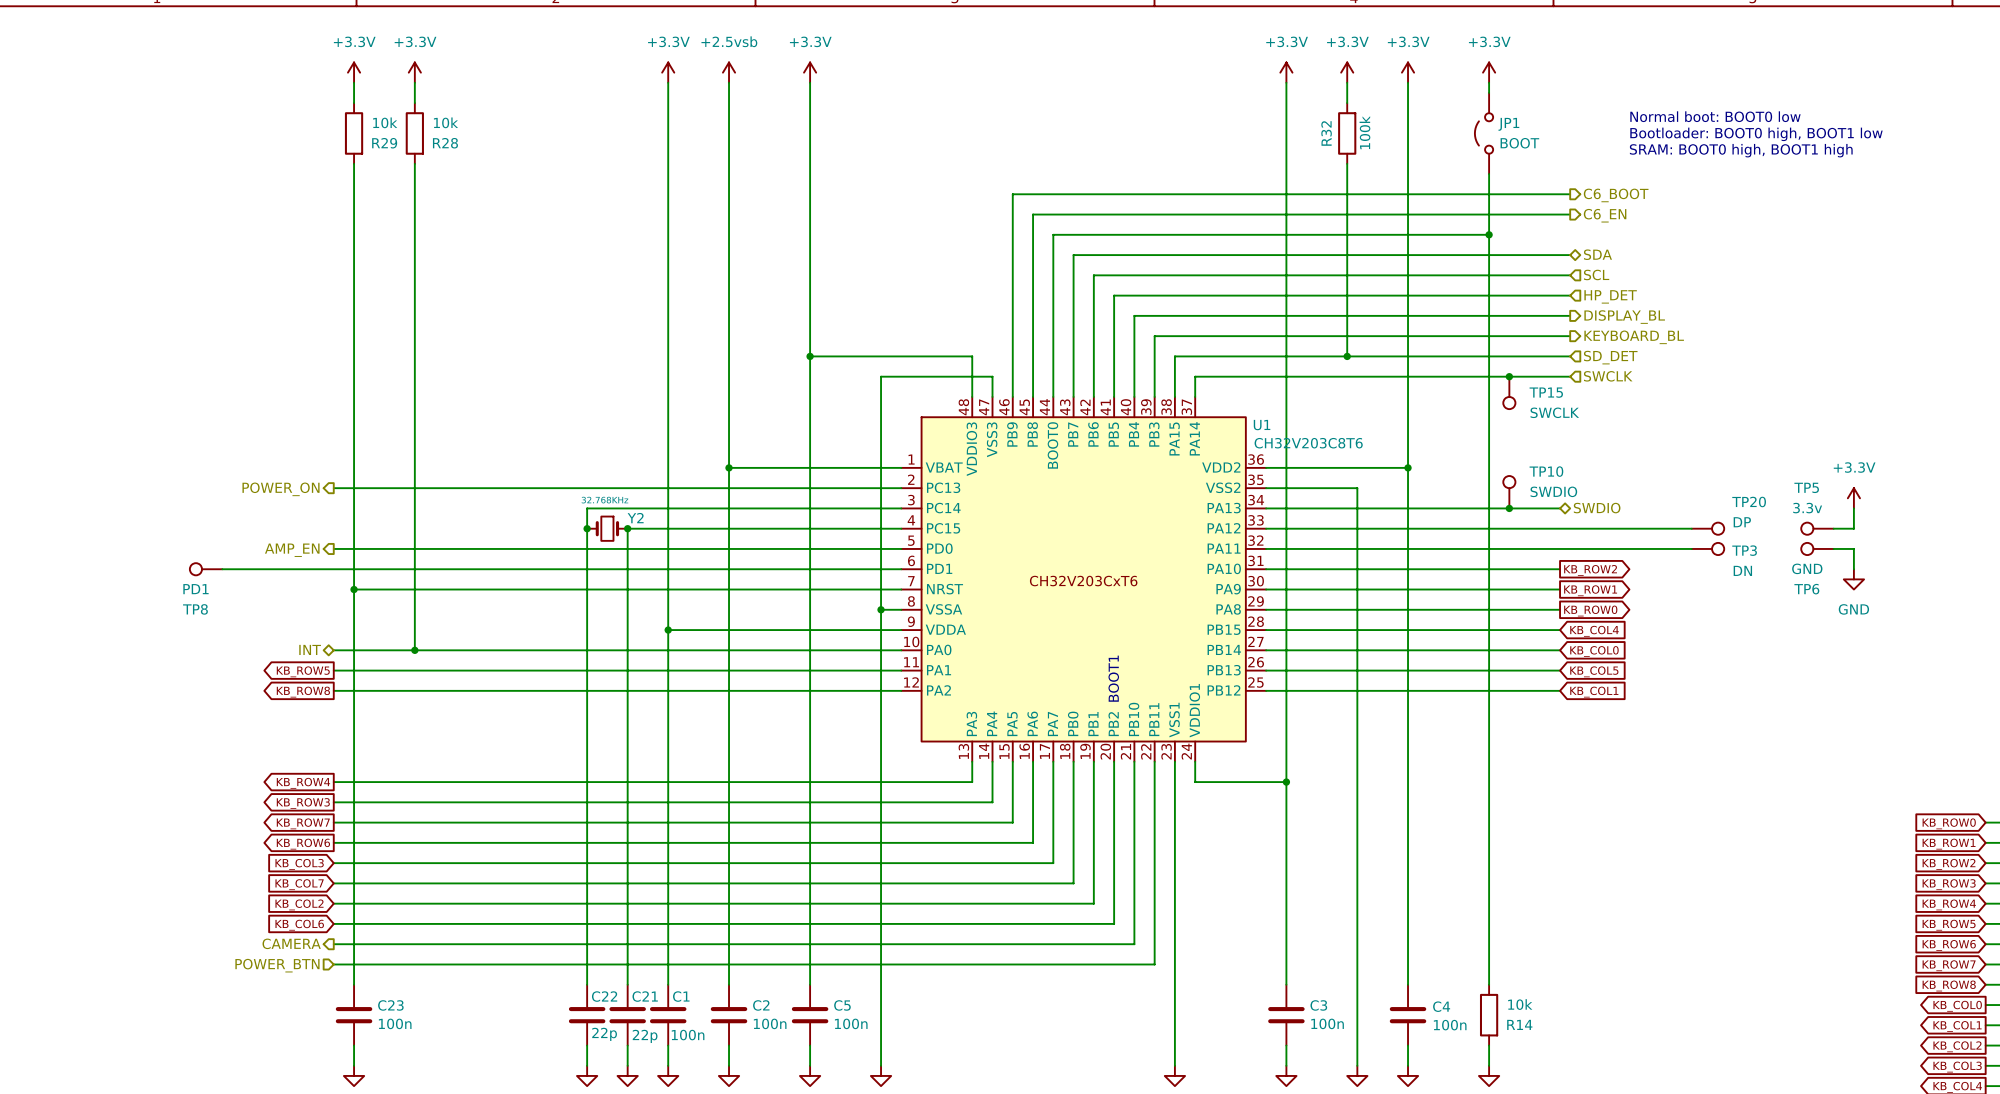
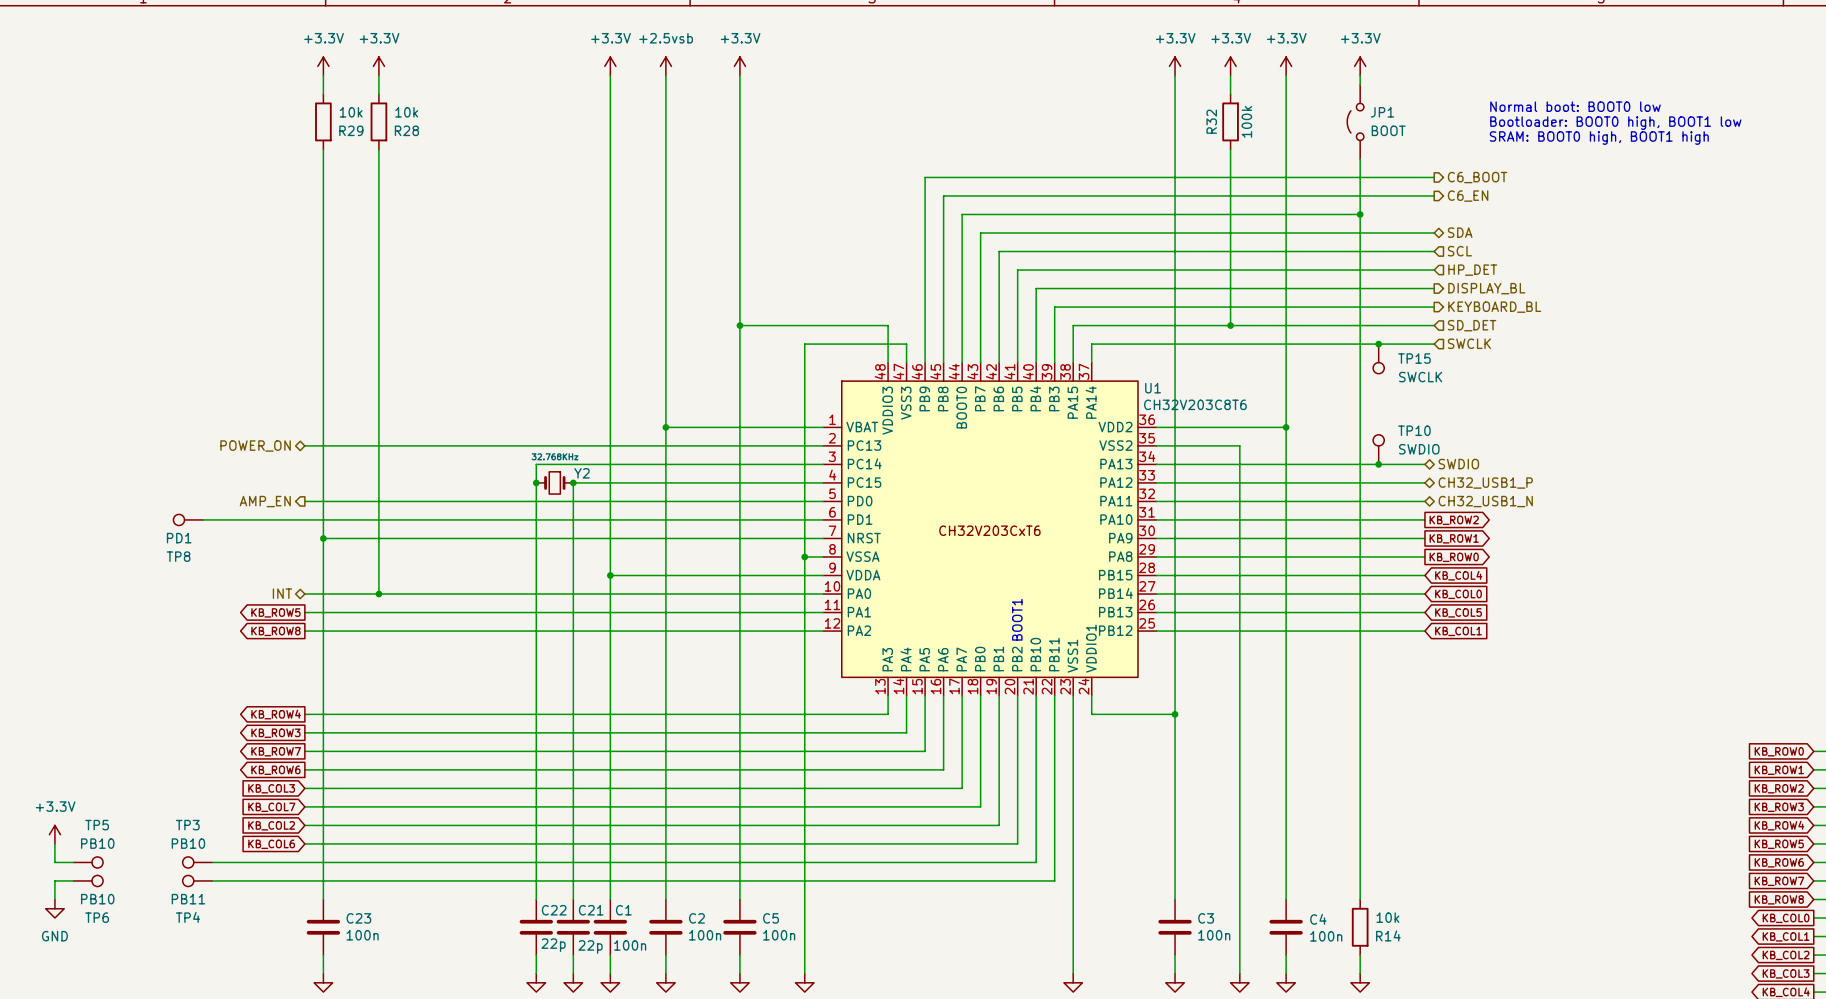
TP5 name position: TP5 (1806, 487) -> TP5 (97, 825)
hierarchical label shape: output (281, 489) -> bidirectional (255, 446)
power symbol: +3.3V (1853, 498) -> none
TP5 value: 3.3v (1807, 508) -> PB10 (97, 843)
wire: (1853, 508) (1853, 528) (1833, 528) -> none
wire: (1560, 528) (1691, 528) -> none
TP20: DP (1707, 528) -> none
TP5 rotation: 0° (1807, 528) -> 180° (97, 862)
TP5 position: (1817, 528) -> (88, 862)
hierarchical label: none -> CH32_USB1_P (1485, 483)
wire: (1560, 548) (1691, 548) -> none
TP3 position: (1707, 548) -> (197, 862)
TP3 rotation: 0° (1718, 548) -> 180° (188, 862)
TP6 rotation: 0° (1807, 548) -> 180° (97, 880)
TP6 position: (1817, 548) -> (88, 880)
wire: (1833, 548) (1853, 548) (1853, 569) -> none
hierarchical label: none -> CH32_USB1_N (1485, 501)
TP3 name position: TP3 (1744, 550) -> TP3 (187, 825)
TP6 value: GND (1807, 568) -> PB10 (97, 899)
TP3 value: DN (1742, 570) -> PB10 (188, 843)
power symbol: GND (1853, 579) -> none
TP6 name position: TP6 (1806, 589) -> TP6 (97, 917)
power symbol: none -> +3.3V (54, 834)
wire: none -> (54, 843) (54, 862) (73, 862)
hierarchical label: CAMERA (291, 943) -> none
wire: none -> (212, 862) (304, 862)
wire: none -> (73, 880) (54, 880) (54, 899)
TP4: none -> PB11 (197, 880)
wire: none -> (212, 880) (304, 880)
hierarchical label: POWER_BTN (277, 965) -> none
power symbol: none -> GND (54, 908)

